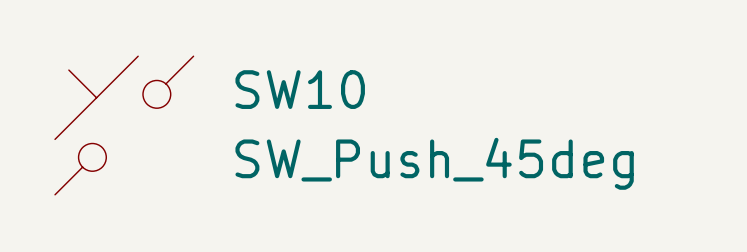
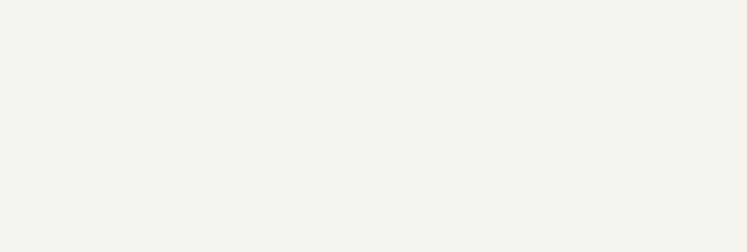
SW10: SW_Push_45deg (124, 125) -> none

